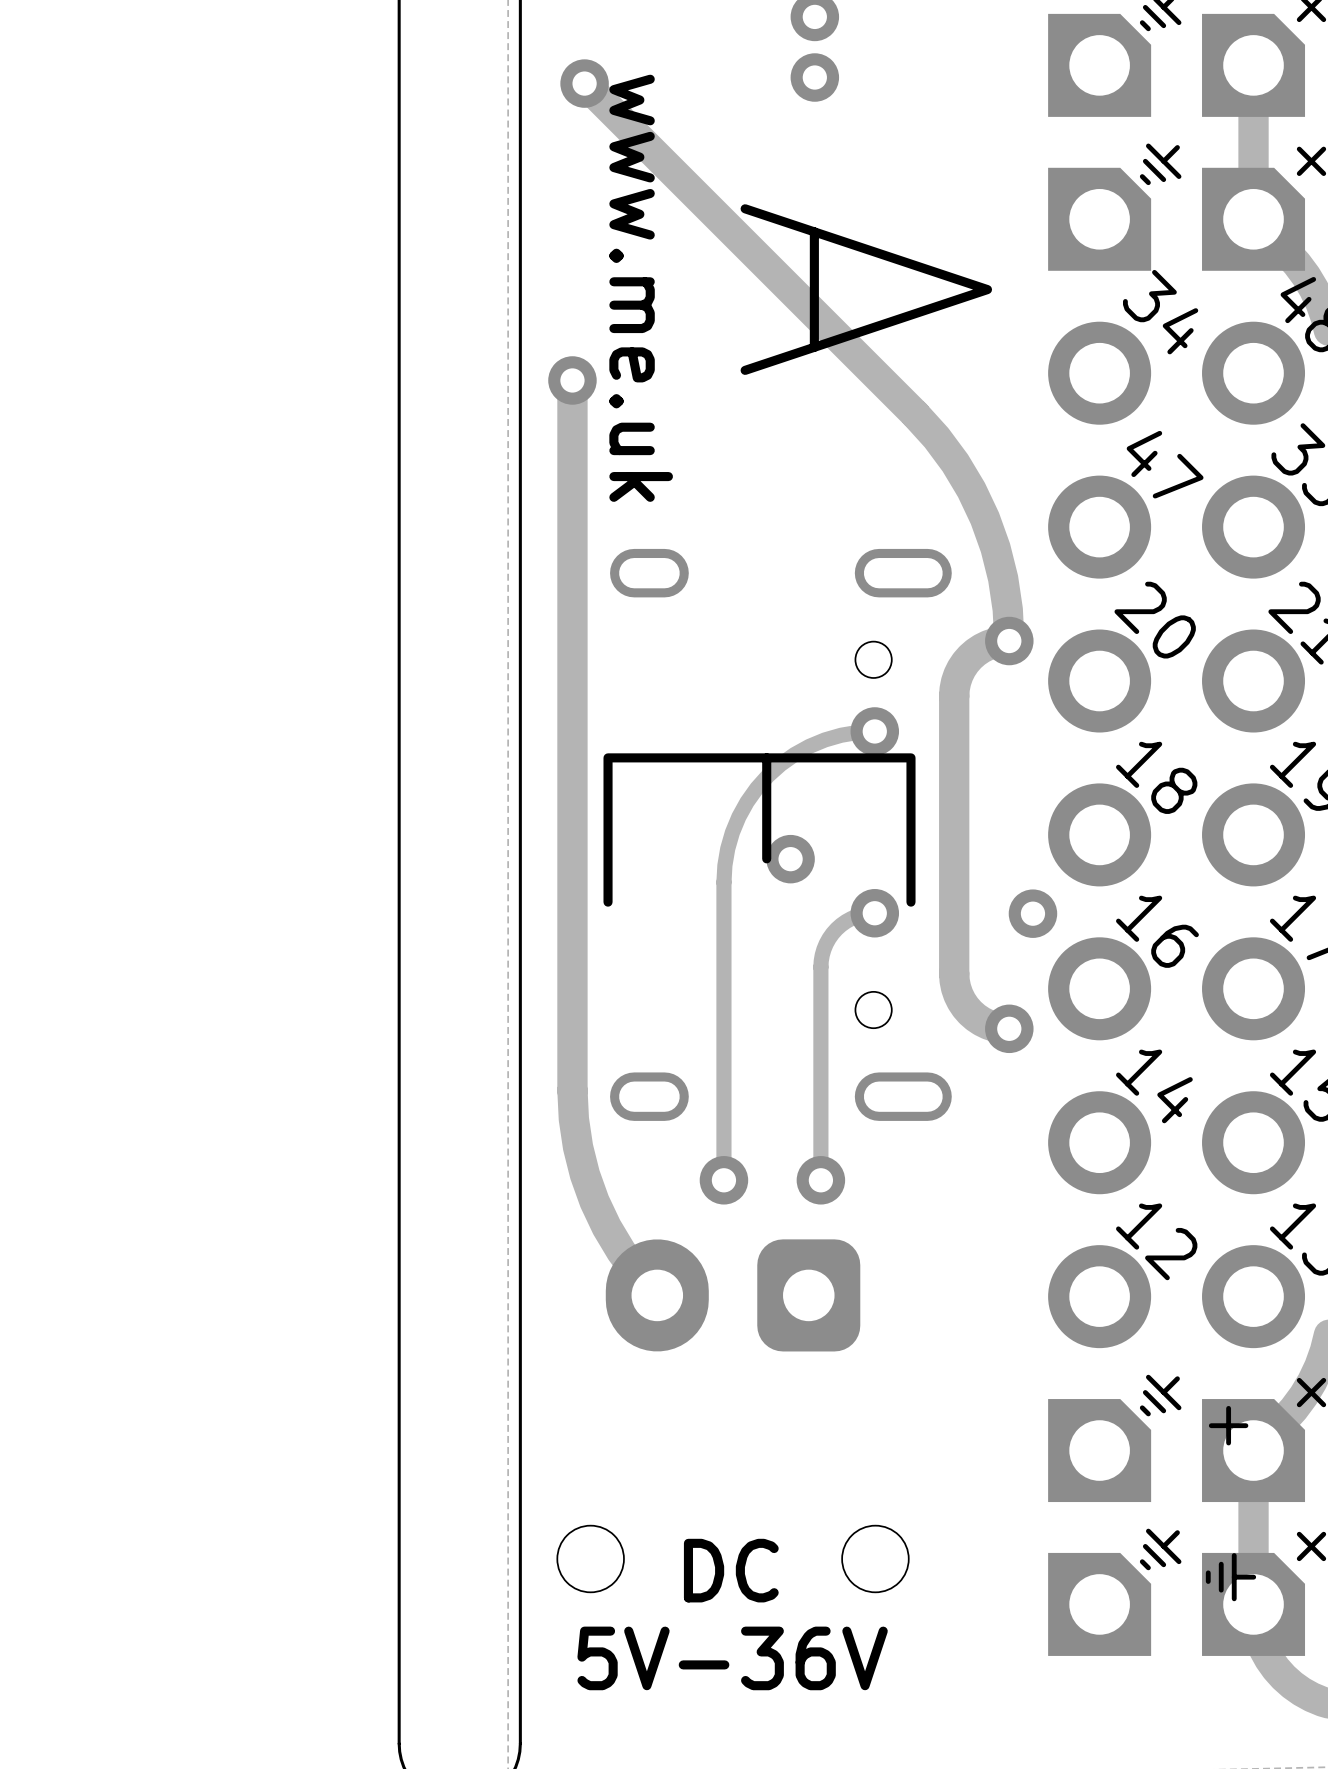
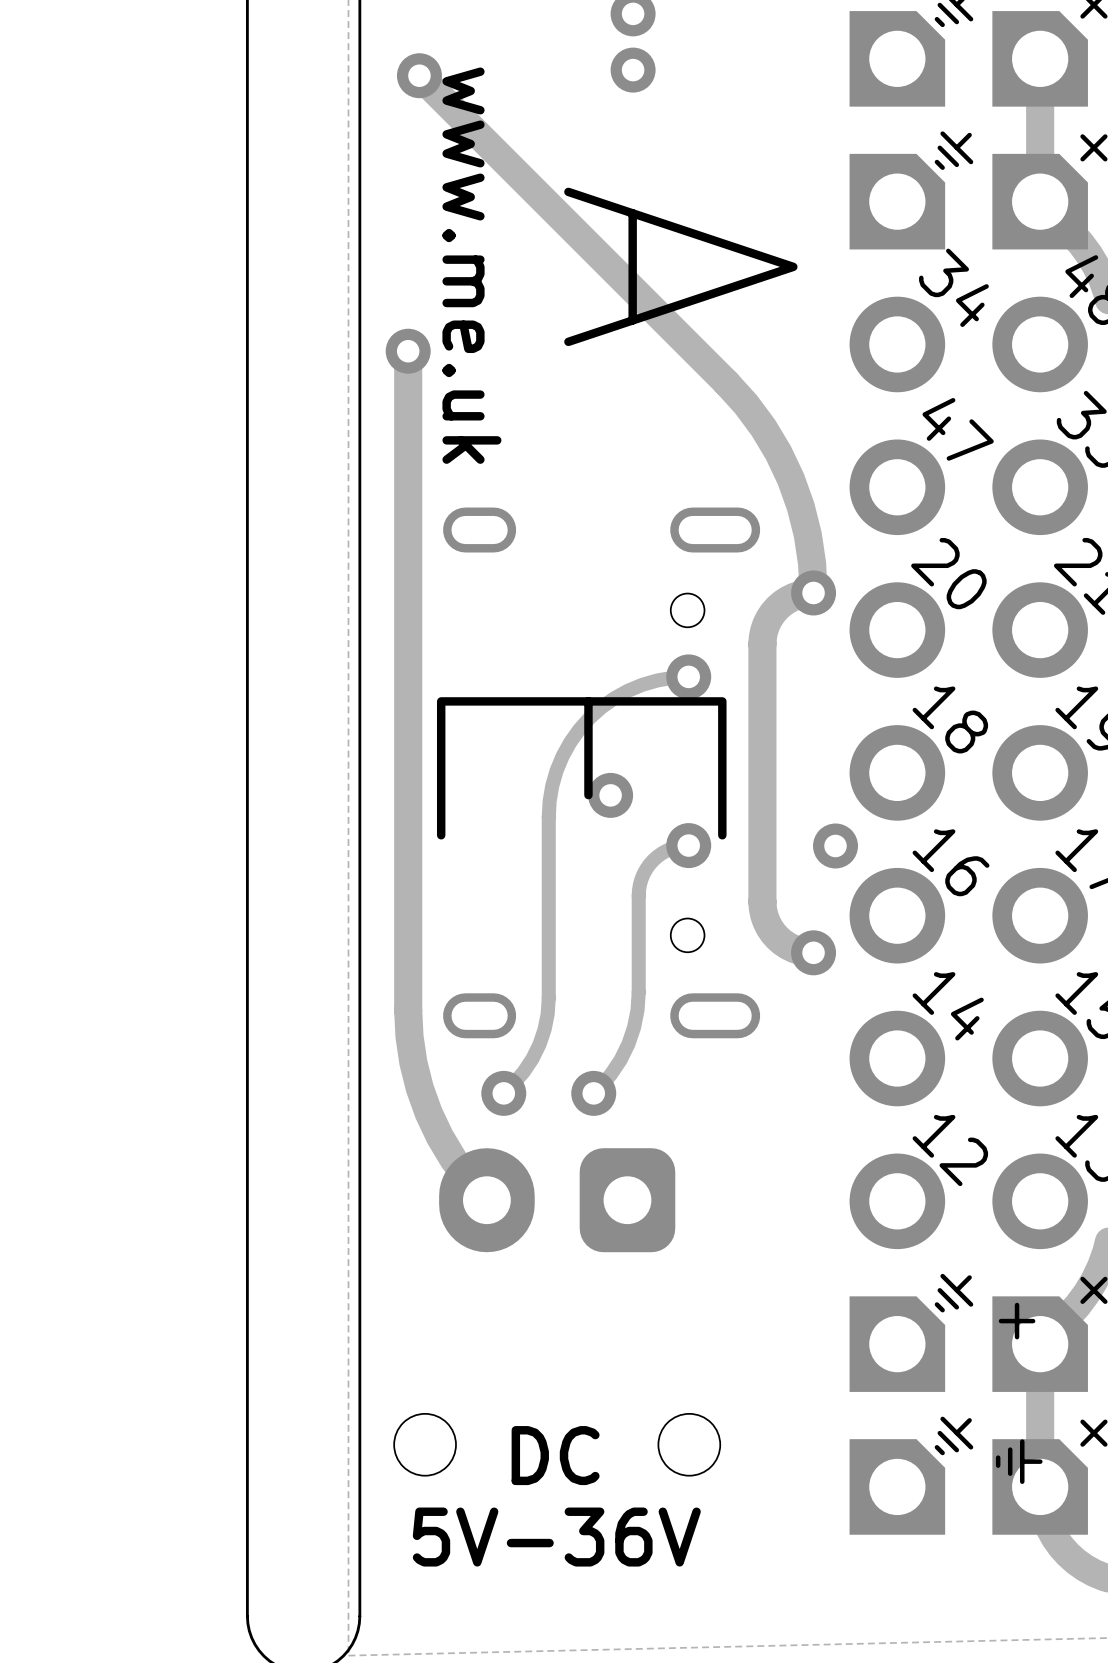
track: (820, 1071) (820, 1180) -> (638, 992) (637, 1009) (628, 1044) (610, 1074) (593, 1093)
track: (723, 1077) (723, 1180) -> (548, 997) (547, 1013) (539, 1044) (523, 1072) (503, 1093)
via: none -> (503, 1093)
via: (723, 1180) -> none
via: none -> (593, 1093)
via: (820, 1180) -> none

